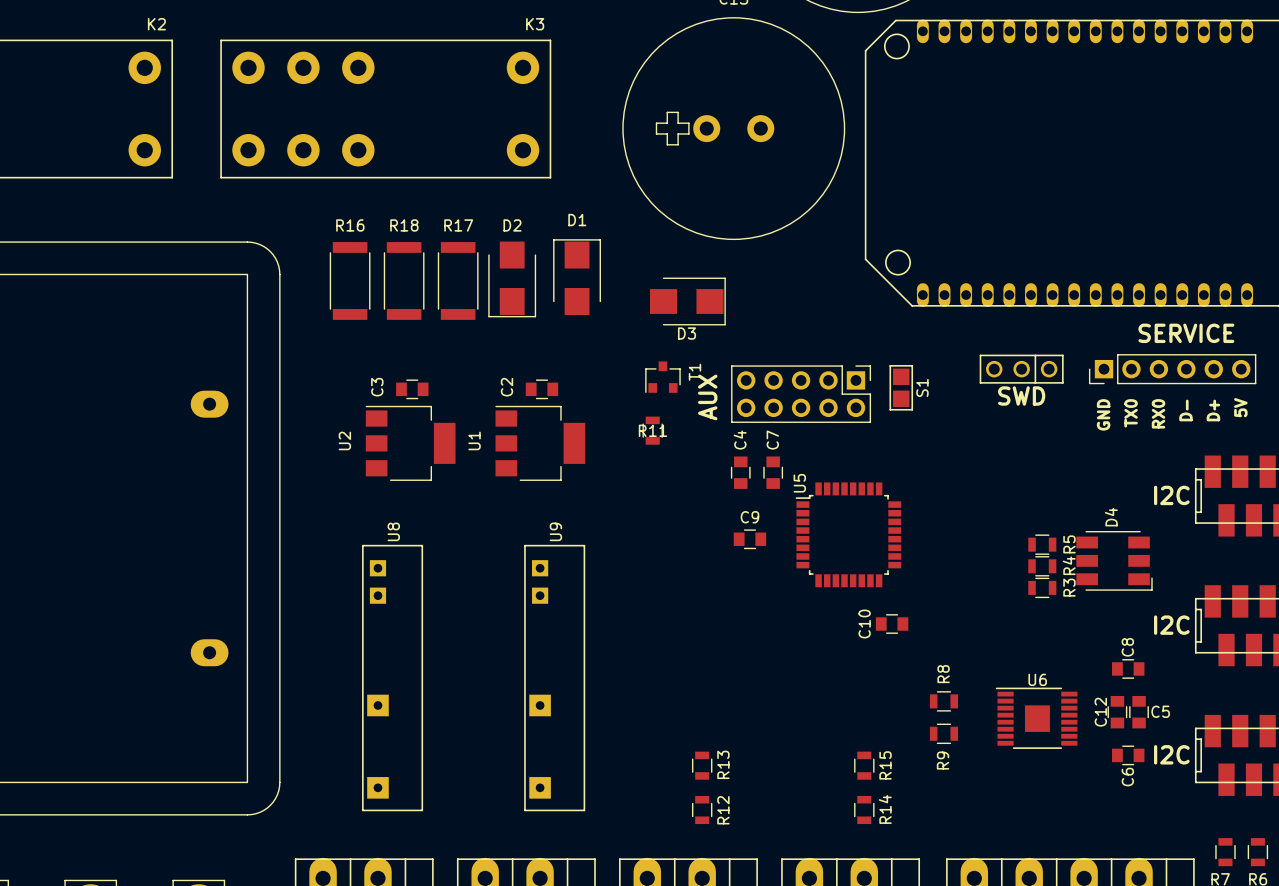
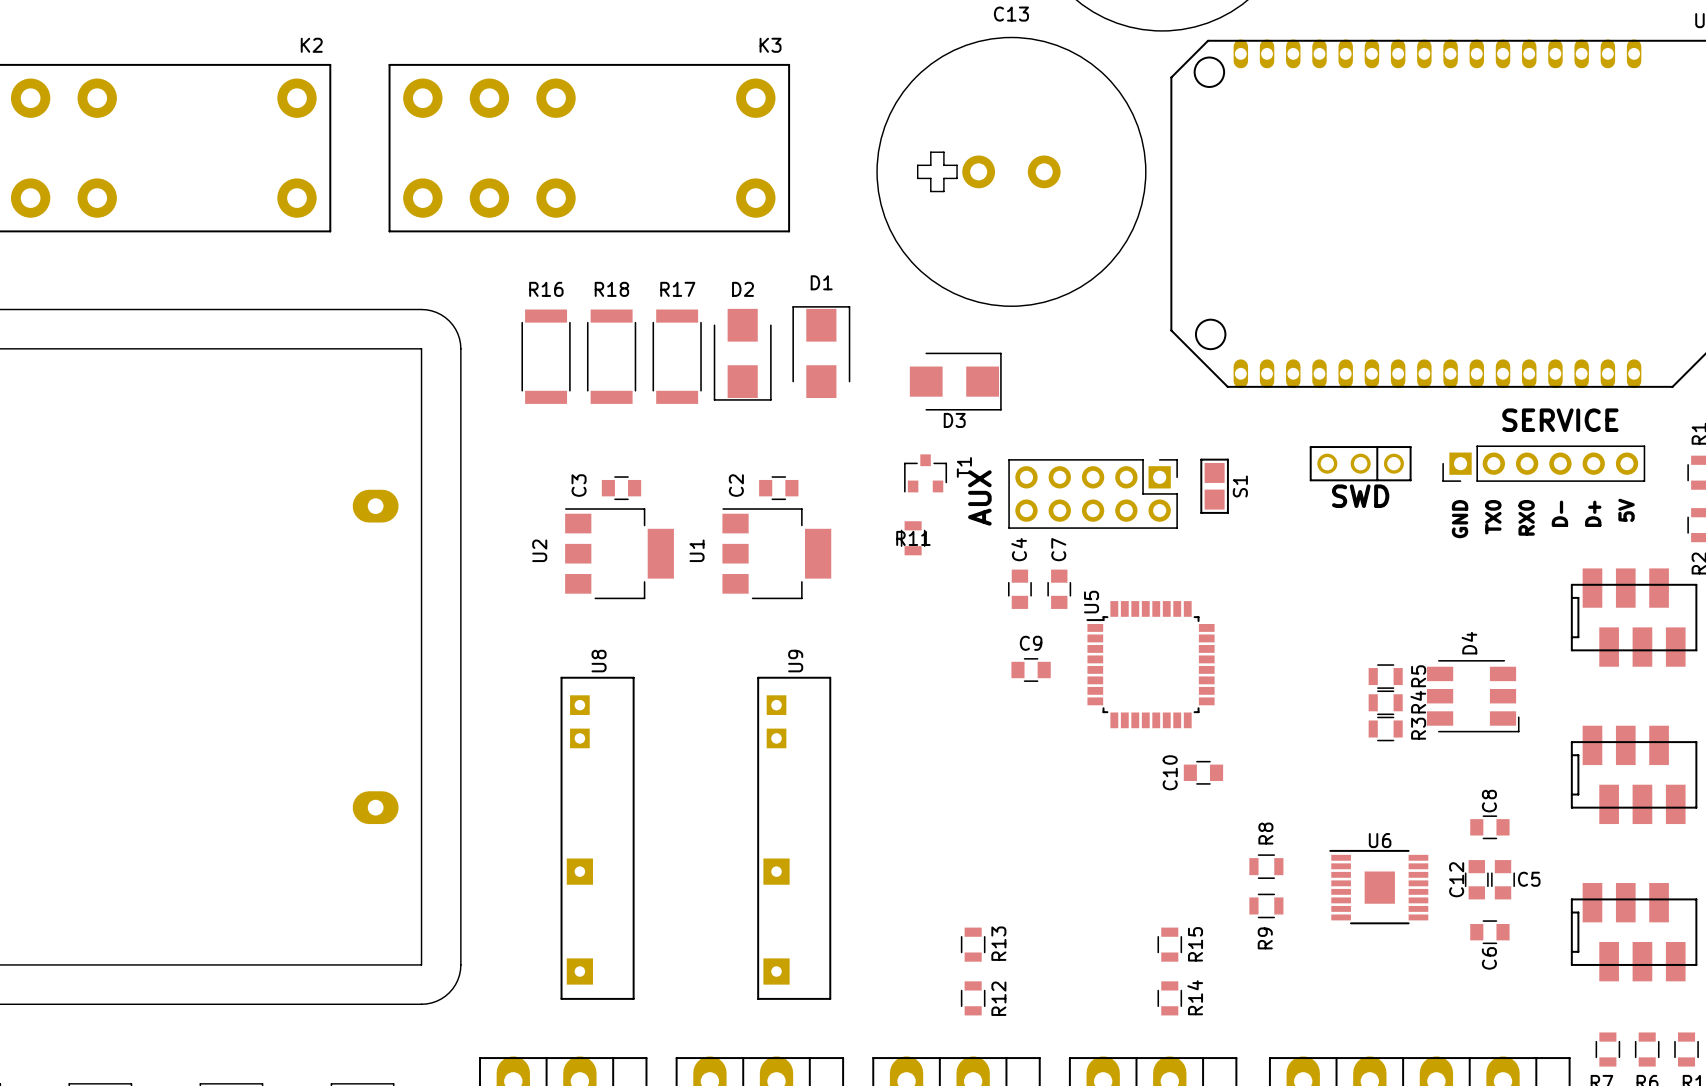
text: I2C (1171, 495) -> none
text: I2C (1171, 625) -> none
text: I2C (1171, 754) -> none

